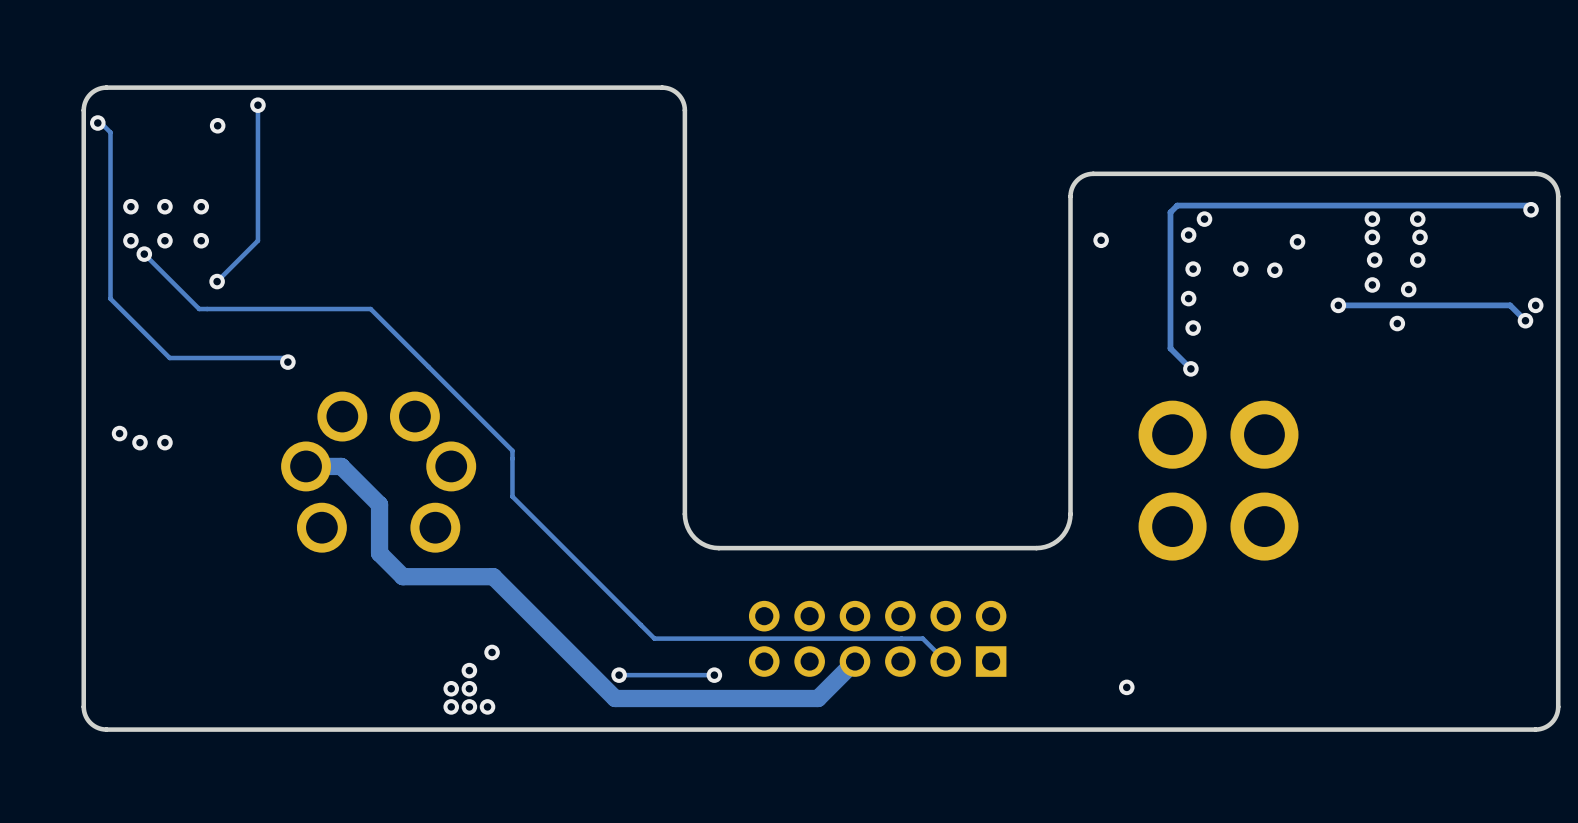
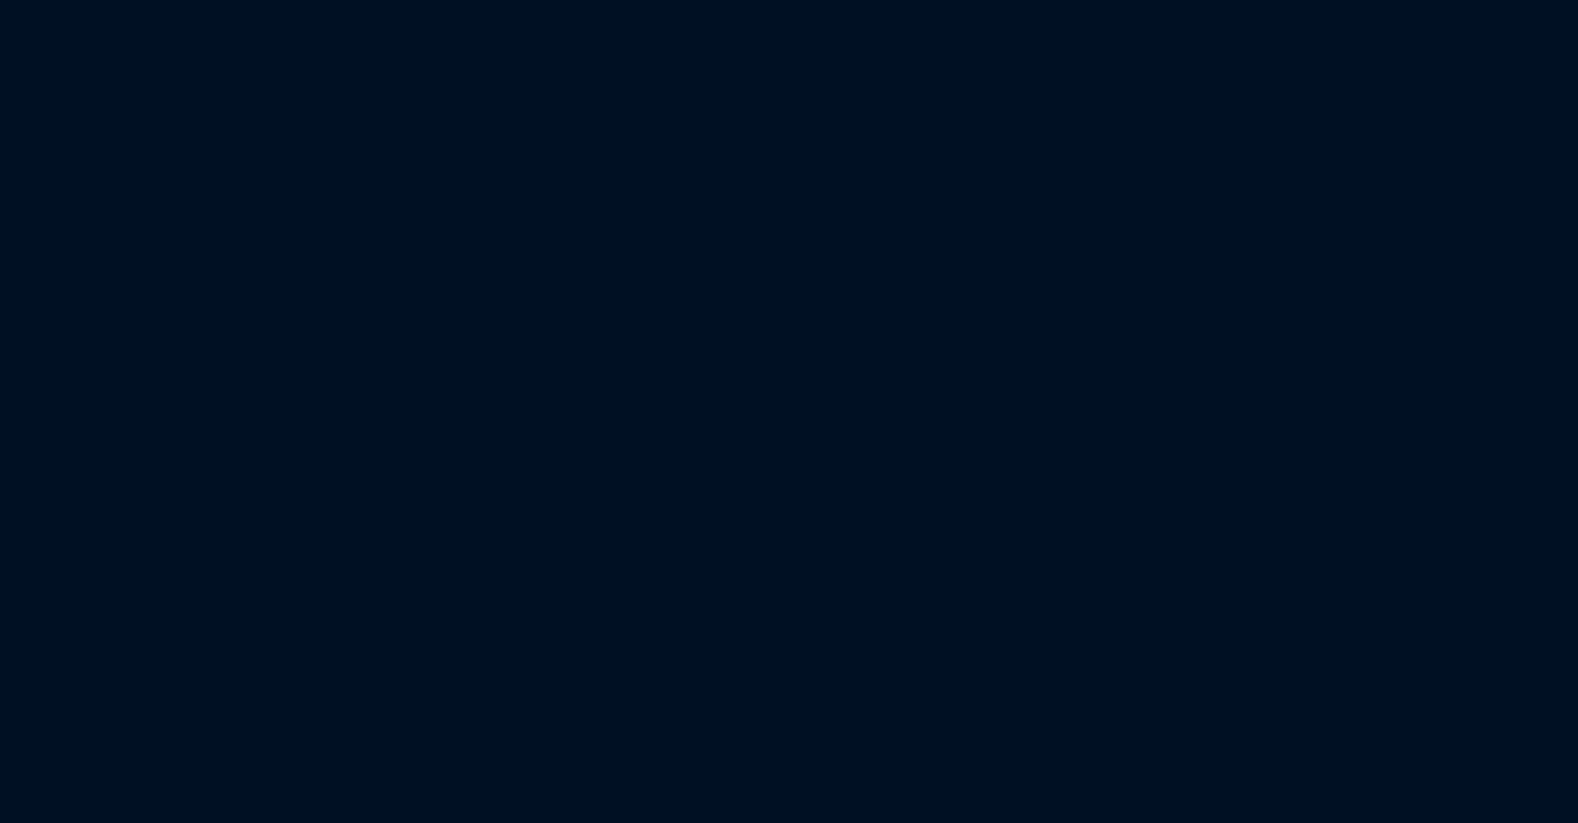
board edge: (662, 87) (106, 87) (98, 88) (90, 94) (85, 102) (83, 110) (83, 706) (85, 716) (90, 722) (98, 728) (106, 729) (1535, 729) (1547, 726) (1554, 718) (1558, 706) (1558, 196) (1554, 184) (1547, 177) (1535, 173) (1093, 173) (1083, 176) (1075, 182) (1070, 193) (1070, 514) (1067, 527) (1060, 538) (1049, 545) (1036, 548) (714, 547) (705, 545) (694, 538) (687, 527) (685, 518) (684, 110) (683, 102) (678, 94) (669, 88) (662, 87) -> none
track: (257, 105) (257, 240) (217, 281) -> none
via: (257, 105) -> none
track: (97, 123) (100, 123) (110, 132) (110, 298) (169, 358) (283, 358) (287, 362) -> none
via: (97, 123) -> none
via: (217, 125) -> none
track: (1533, 205) (1177, 205) (1170, 212) (1170, 348) (1190, 368) -> none
via: (130, 206) -> none
via: (164, 206) -> none
via: (201, 206) -> none
via: (1531, 209) -> none
via: (1204, 219) -> none
via: (1372, 219) -> none
via: (1417, 219) -> none
via: (1188, 235) -> none
via: (1372, 237) -> none
via: (1420, 237) -> none
via: (130, 240) -> none
via: (164, 240) -> none
via: (201, 240) -> none
via: (1101, 240) -> none
via: (1297, 241) -> none
track: (144, 254) (199, 309) (370, 309) (512, 450) (512, 496) (654, 638) (922, 638) (945, 661) -> none
via: (144, 254) -> none
via: (1374, 260) -> none
via: (1417, 260) -> none
via: (1193, 269) -> none
via: (1240, 269) -> none
via: (1274, 270) -> none
via: (217, 281) -> none
via: (1372, 284) -> none
via: (1408, 289) -> none
via: (1188, 298) -> none
track: (1338, 305) (1510, 305) (1525, 320) -> none
via: (1338, 305) -> none
via: (1535, 305) -> none
via: (1525, 320) -> none
via: (1397, 323) -> none
via: (1193, 328) -> none
via: (287, 362) -> none
via: (1190, 368) -> none
via: (119, 433) -> none
via: (140, 442) -> none
via: (164, 442) -> none
track: (306, 466) (341, 466) (379, 504) (379, 553) (402, 576) (493, 576) (615, 698) (818, 698) (855, 661) -> none
part: (378, 472) -> none
part: (1218, 480) -> none
part: (877, 638) -> none
via: (492, 652) -> none
via: (469, 670) -> none
via: (619, 675) -> none
track: (714, 675) (619, 675) -> none
via: (714, 675) -> none
via: (1126, 687) -> none
via: (451, 688) -> none
via: (469, 688) -> none
via: (451, 706) -> none
via: (469, 706) -> none
via: (487, 706) -> none

